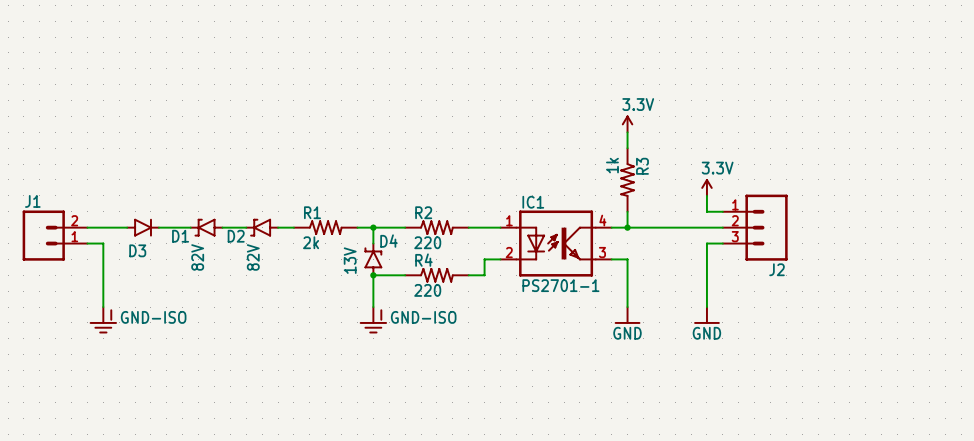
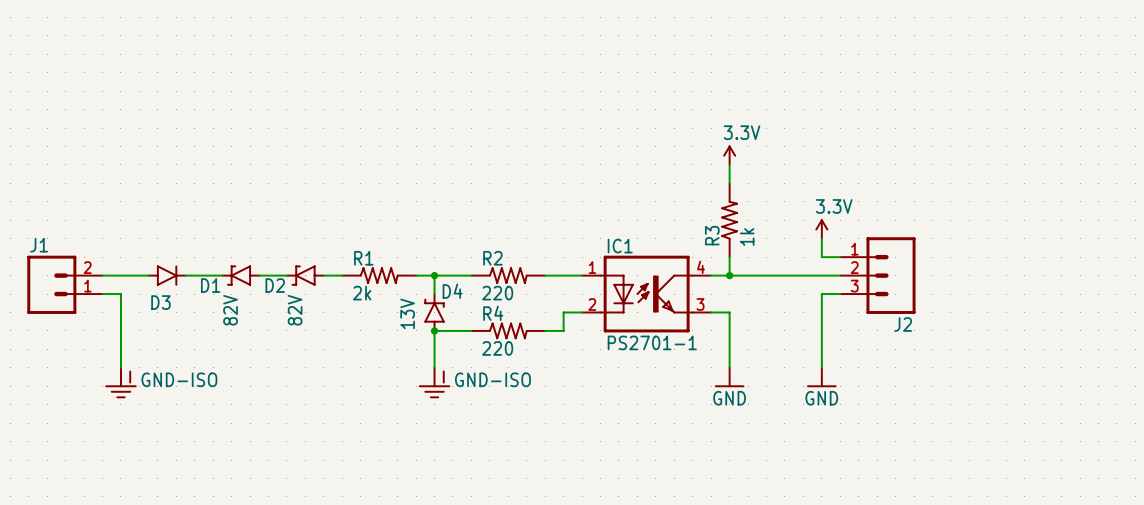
R3 rotation: 0° (627, 179) -> 180° (729, 220)

